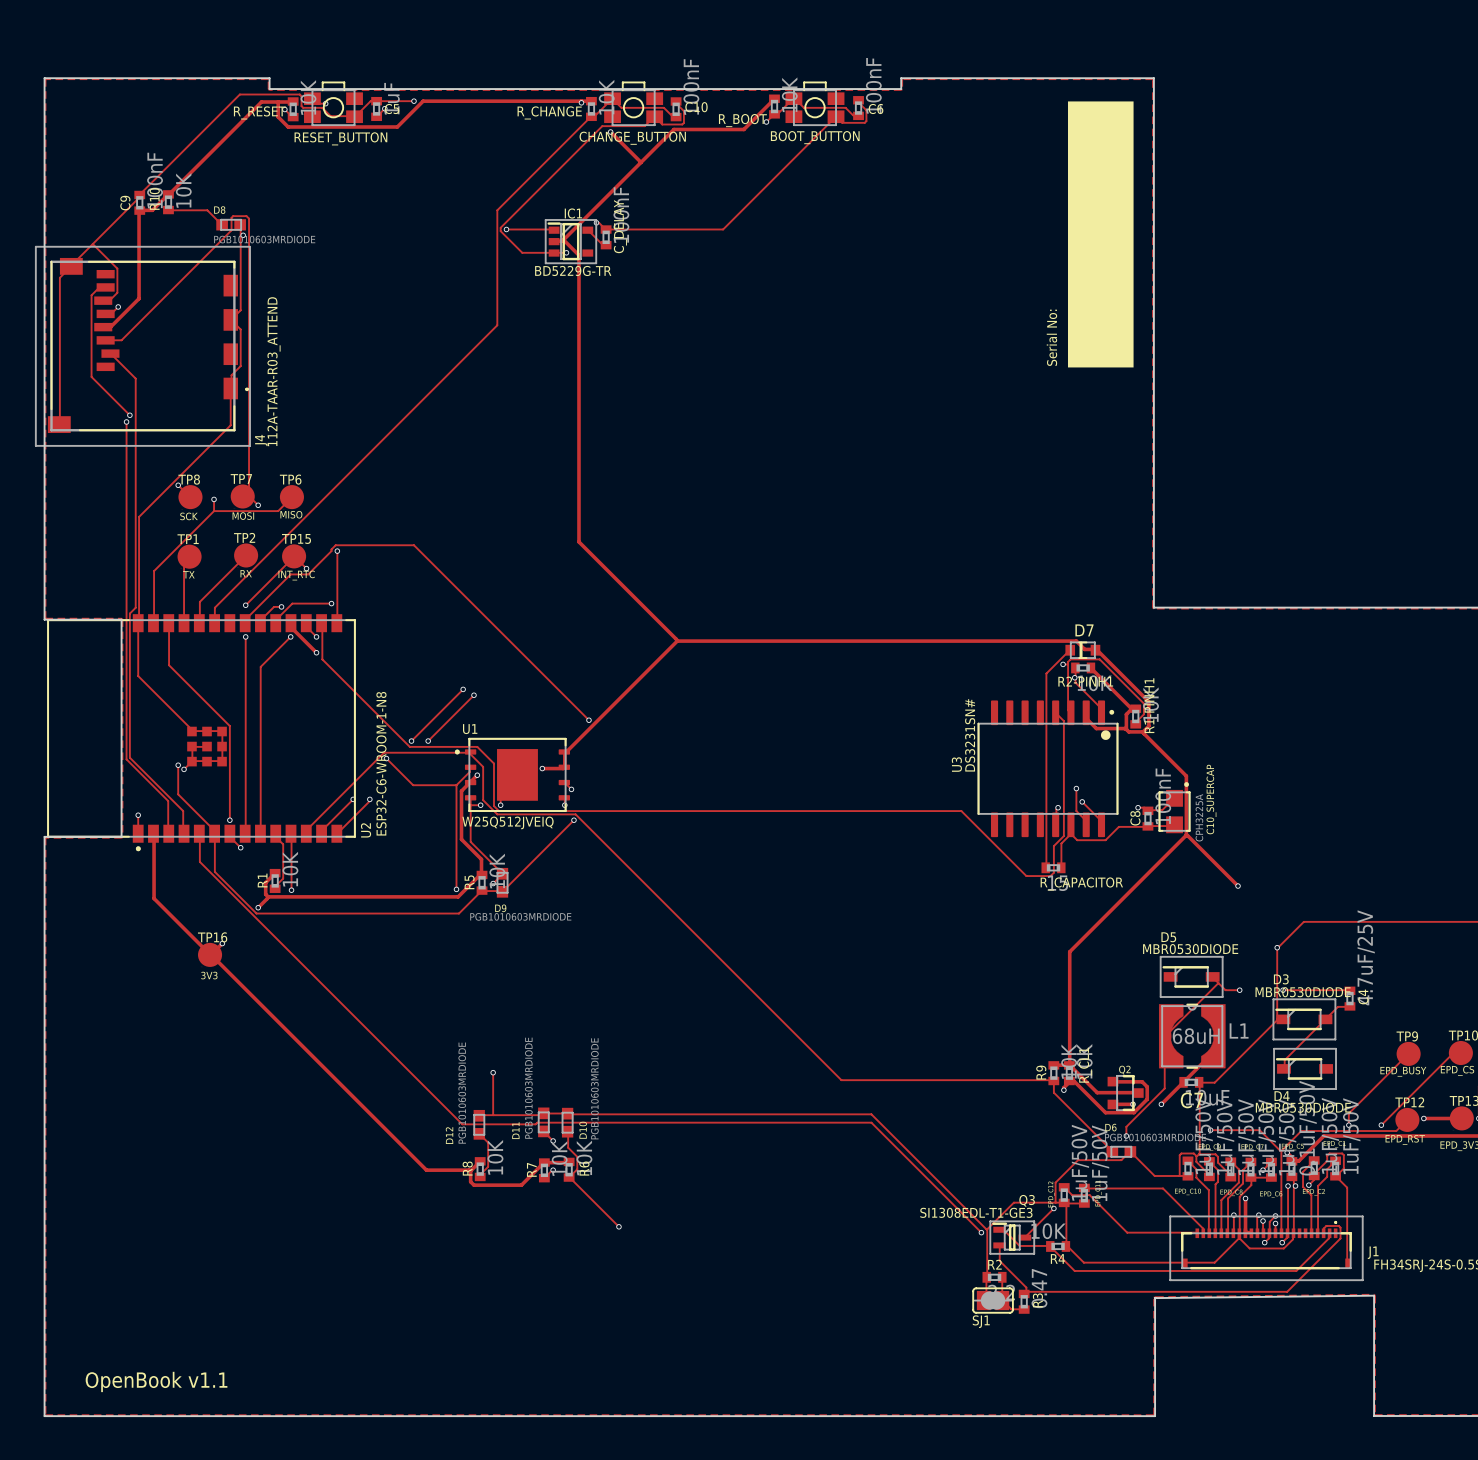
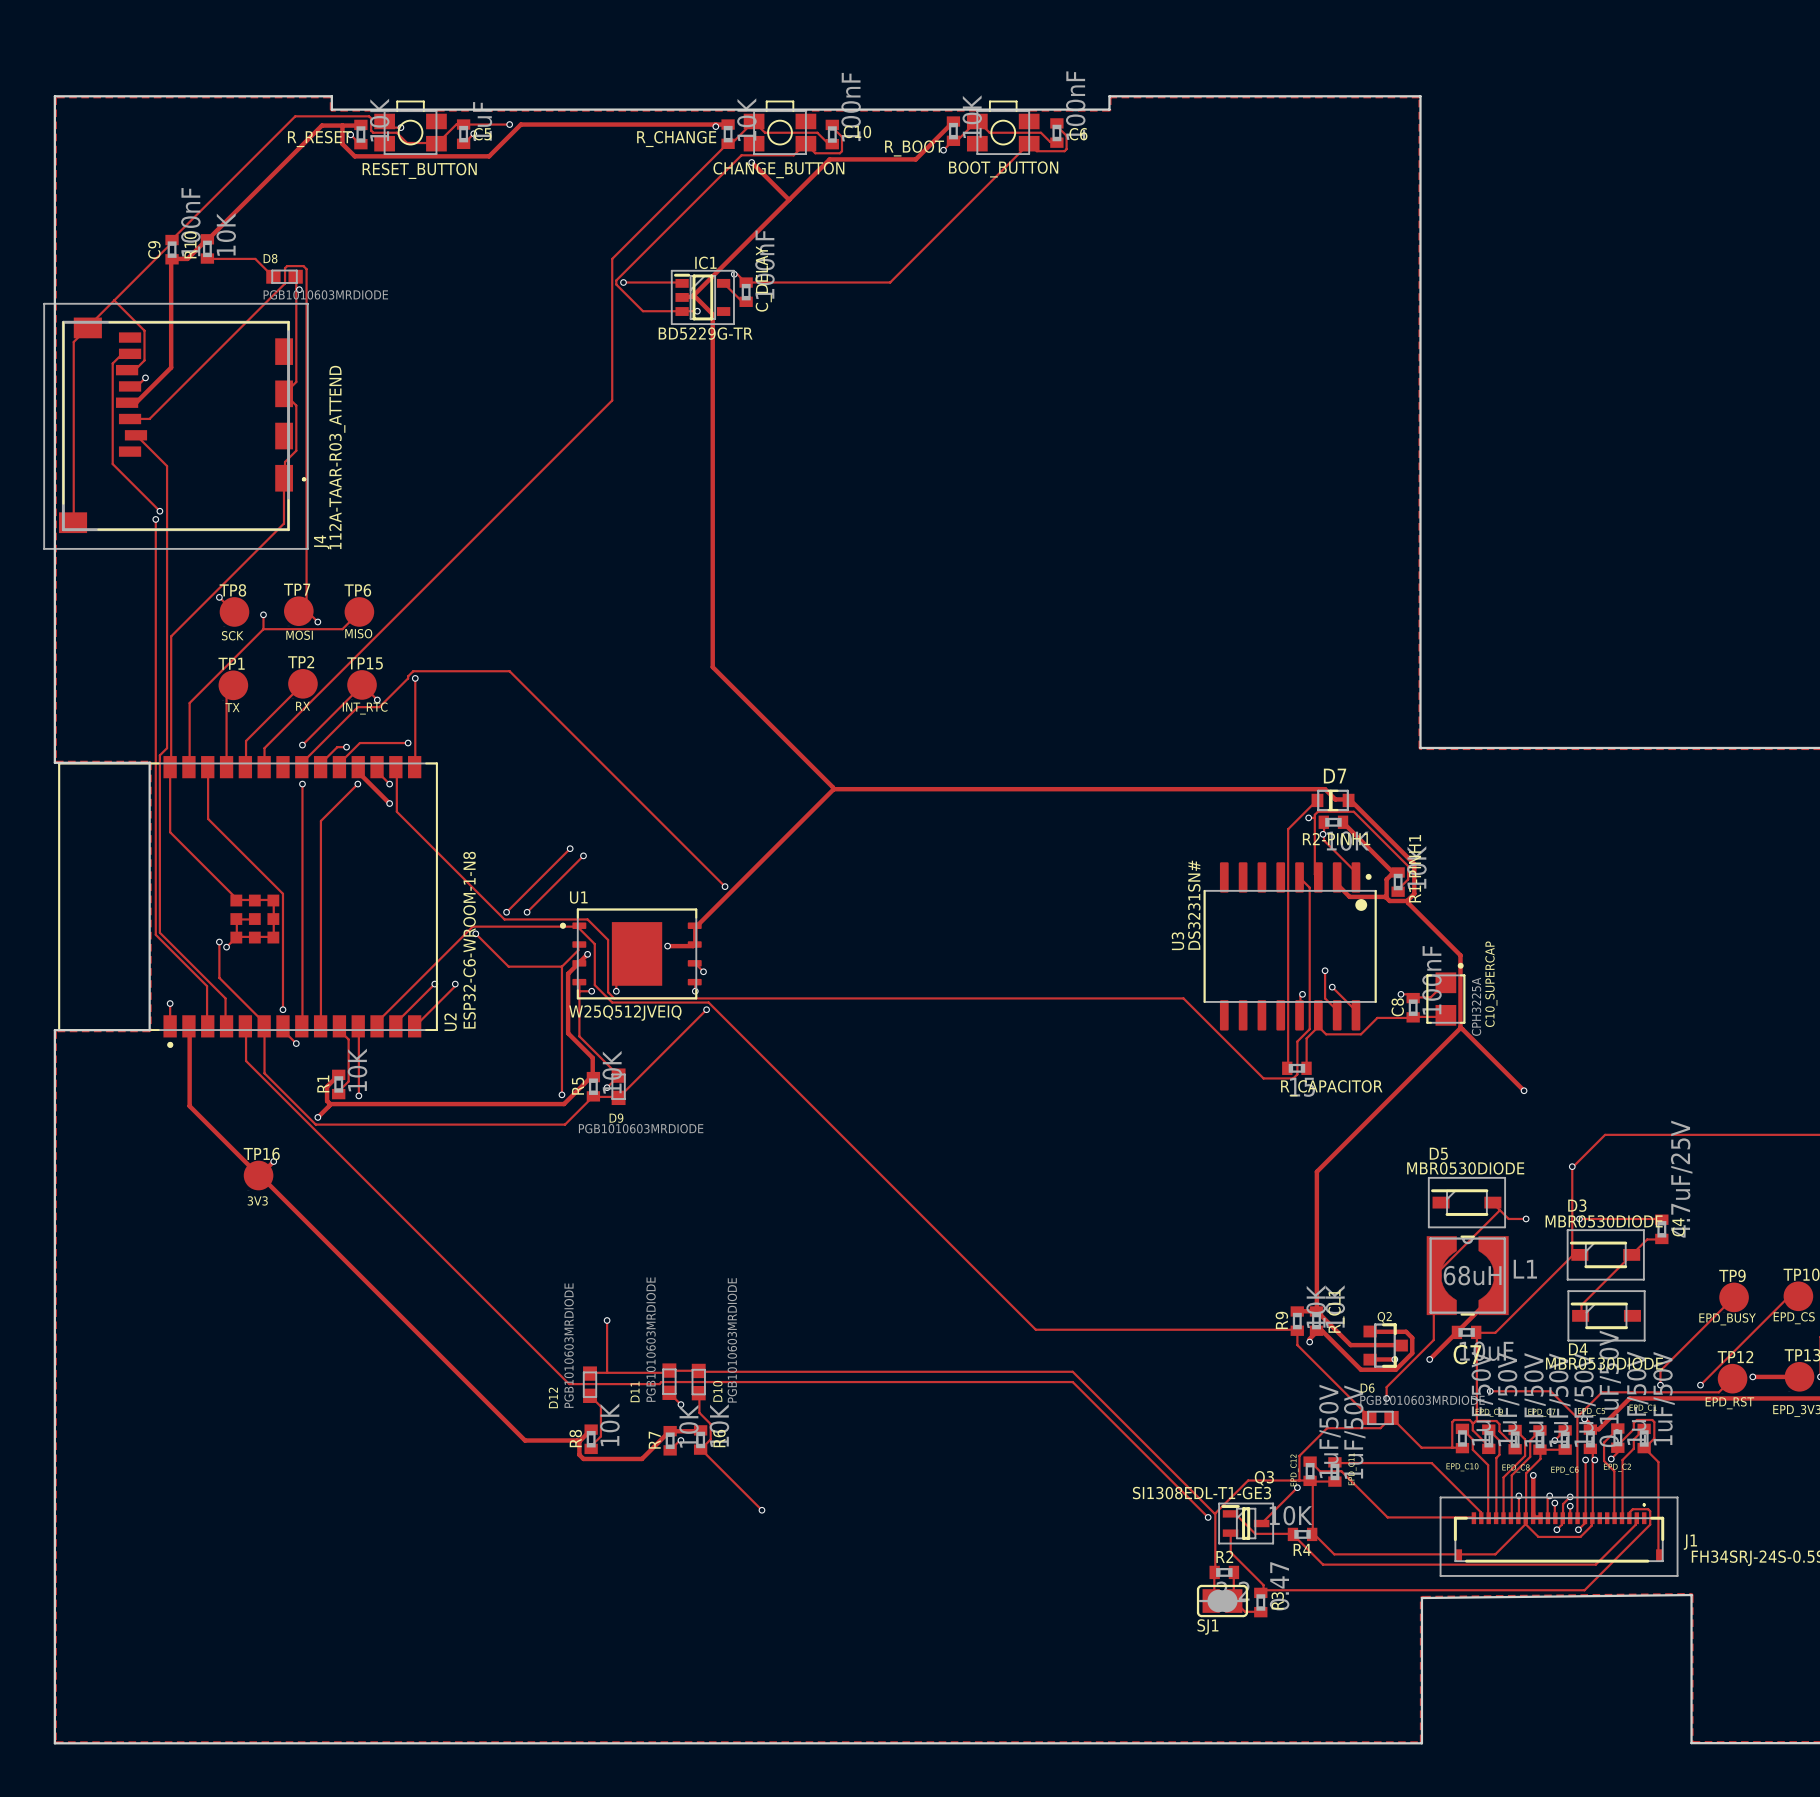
drawing: [1067, 101, 1134, 368] -> none
text: Serial No: (1051, 337) -> none
text: OpenBook v1.1 (156, 1381) -> none

